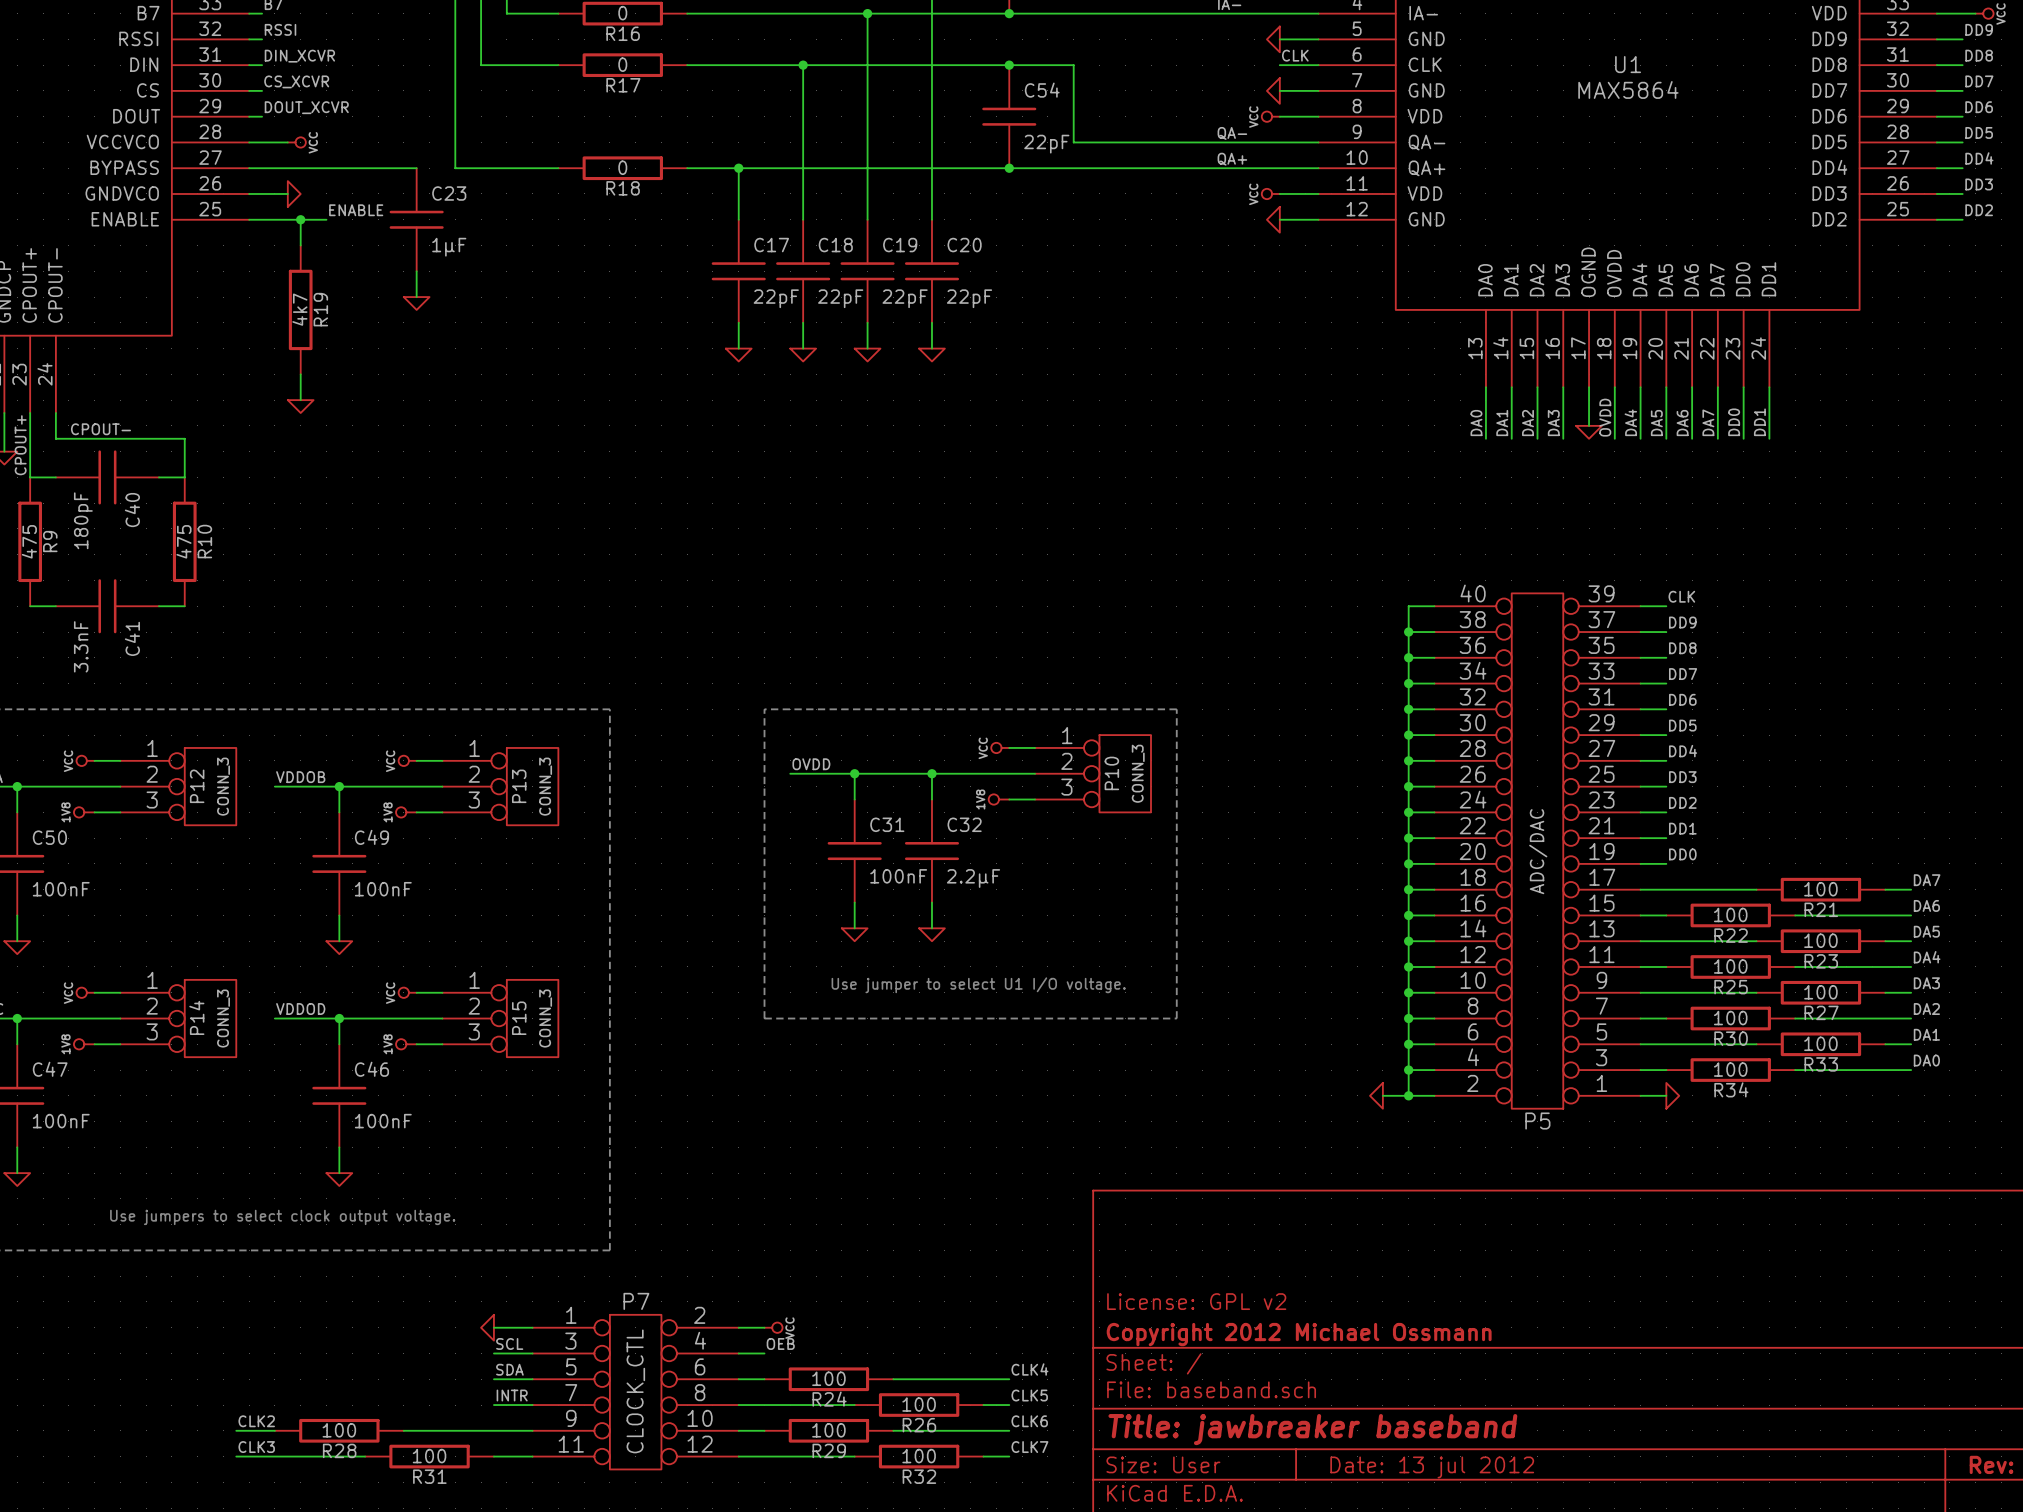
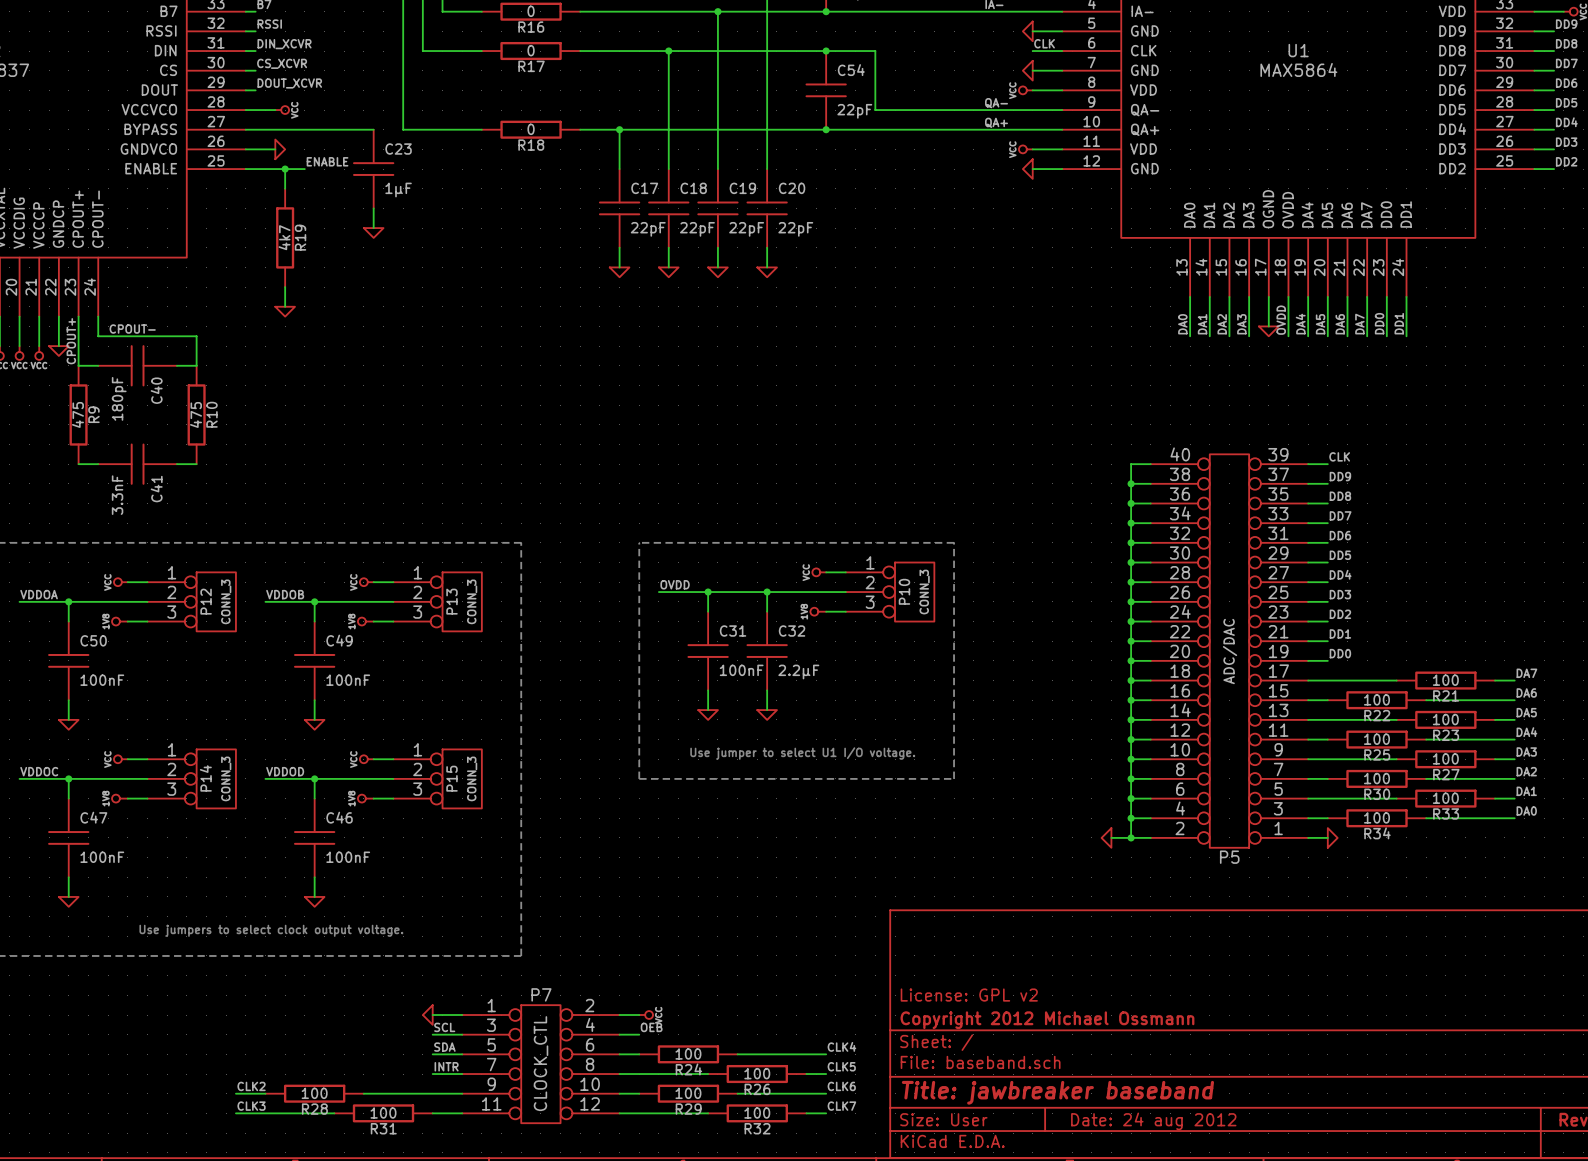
title block: Date: 13 jul 2012 (1432, 1467) -> Date: 24 aug 2012 (1153, 1121)

